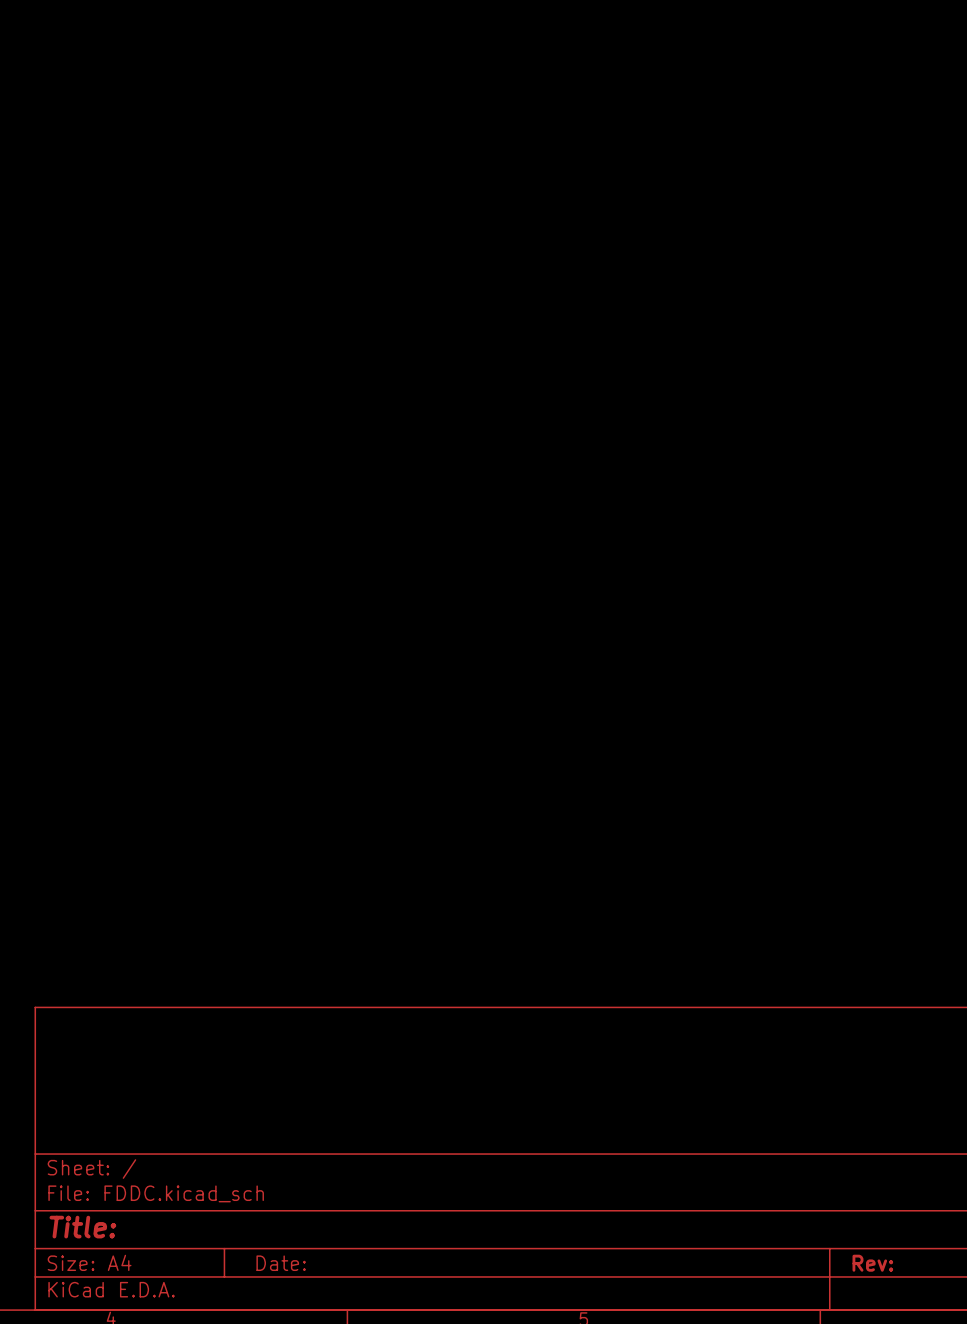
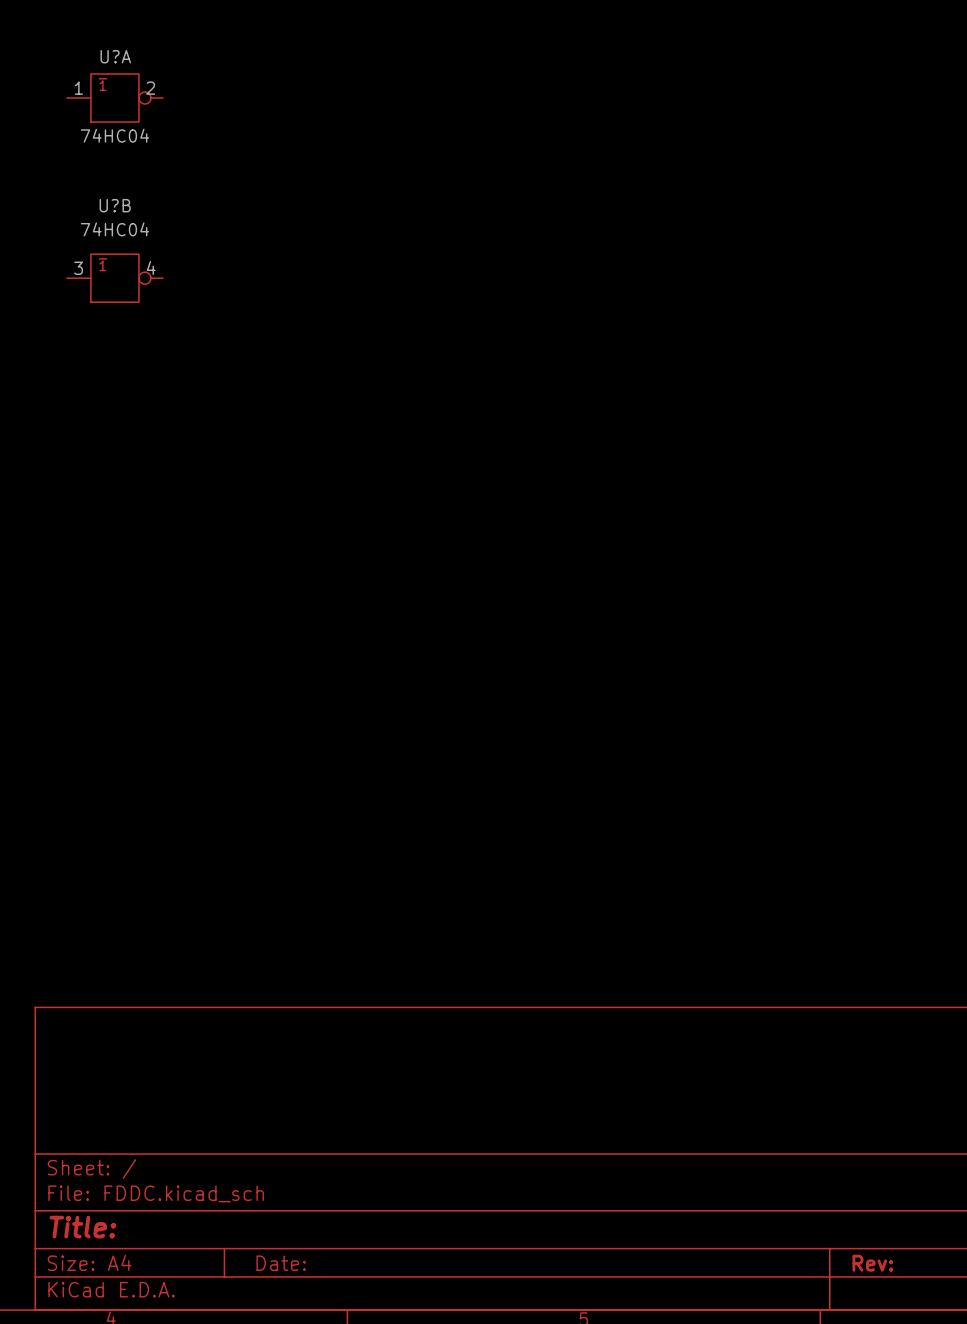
U?A: none -> 74HC04 (114, 98)
U?B: none -> 74HC04 (114, 278)

